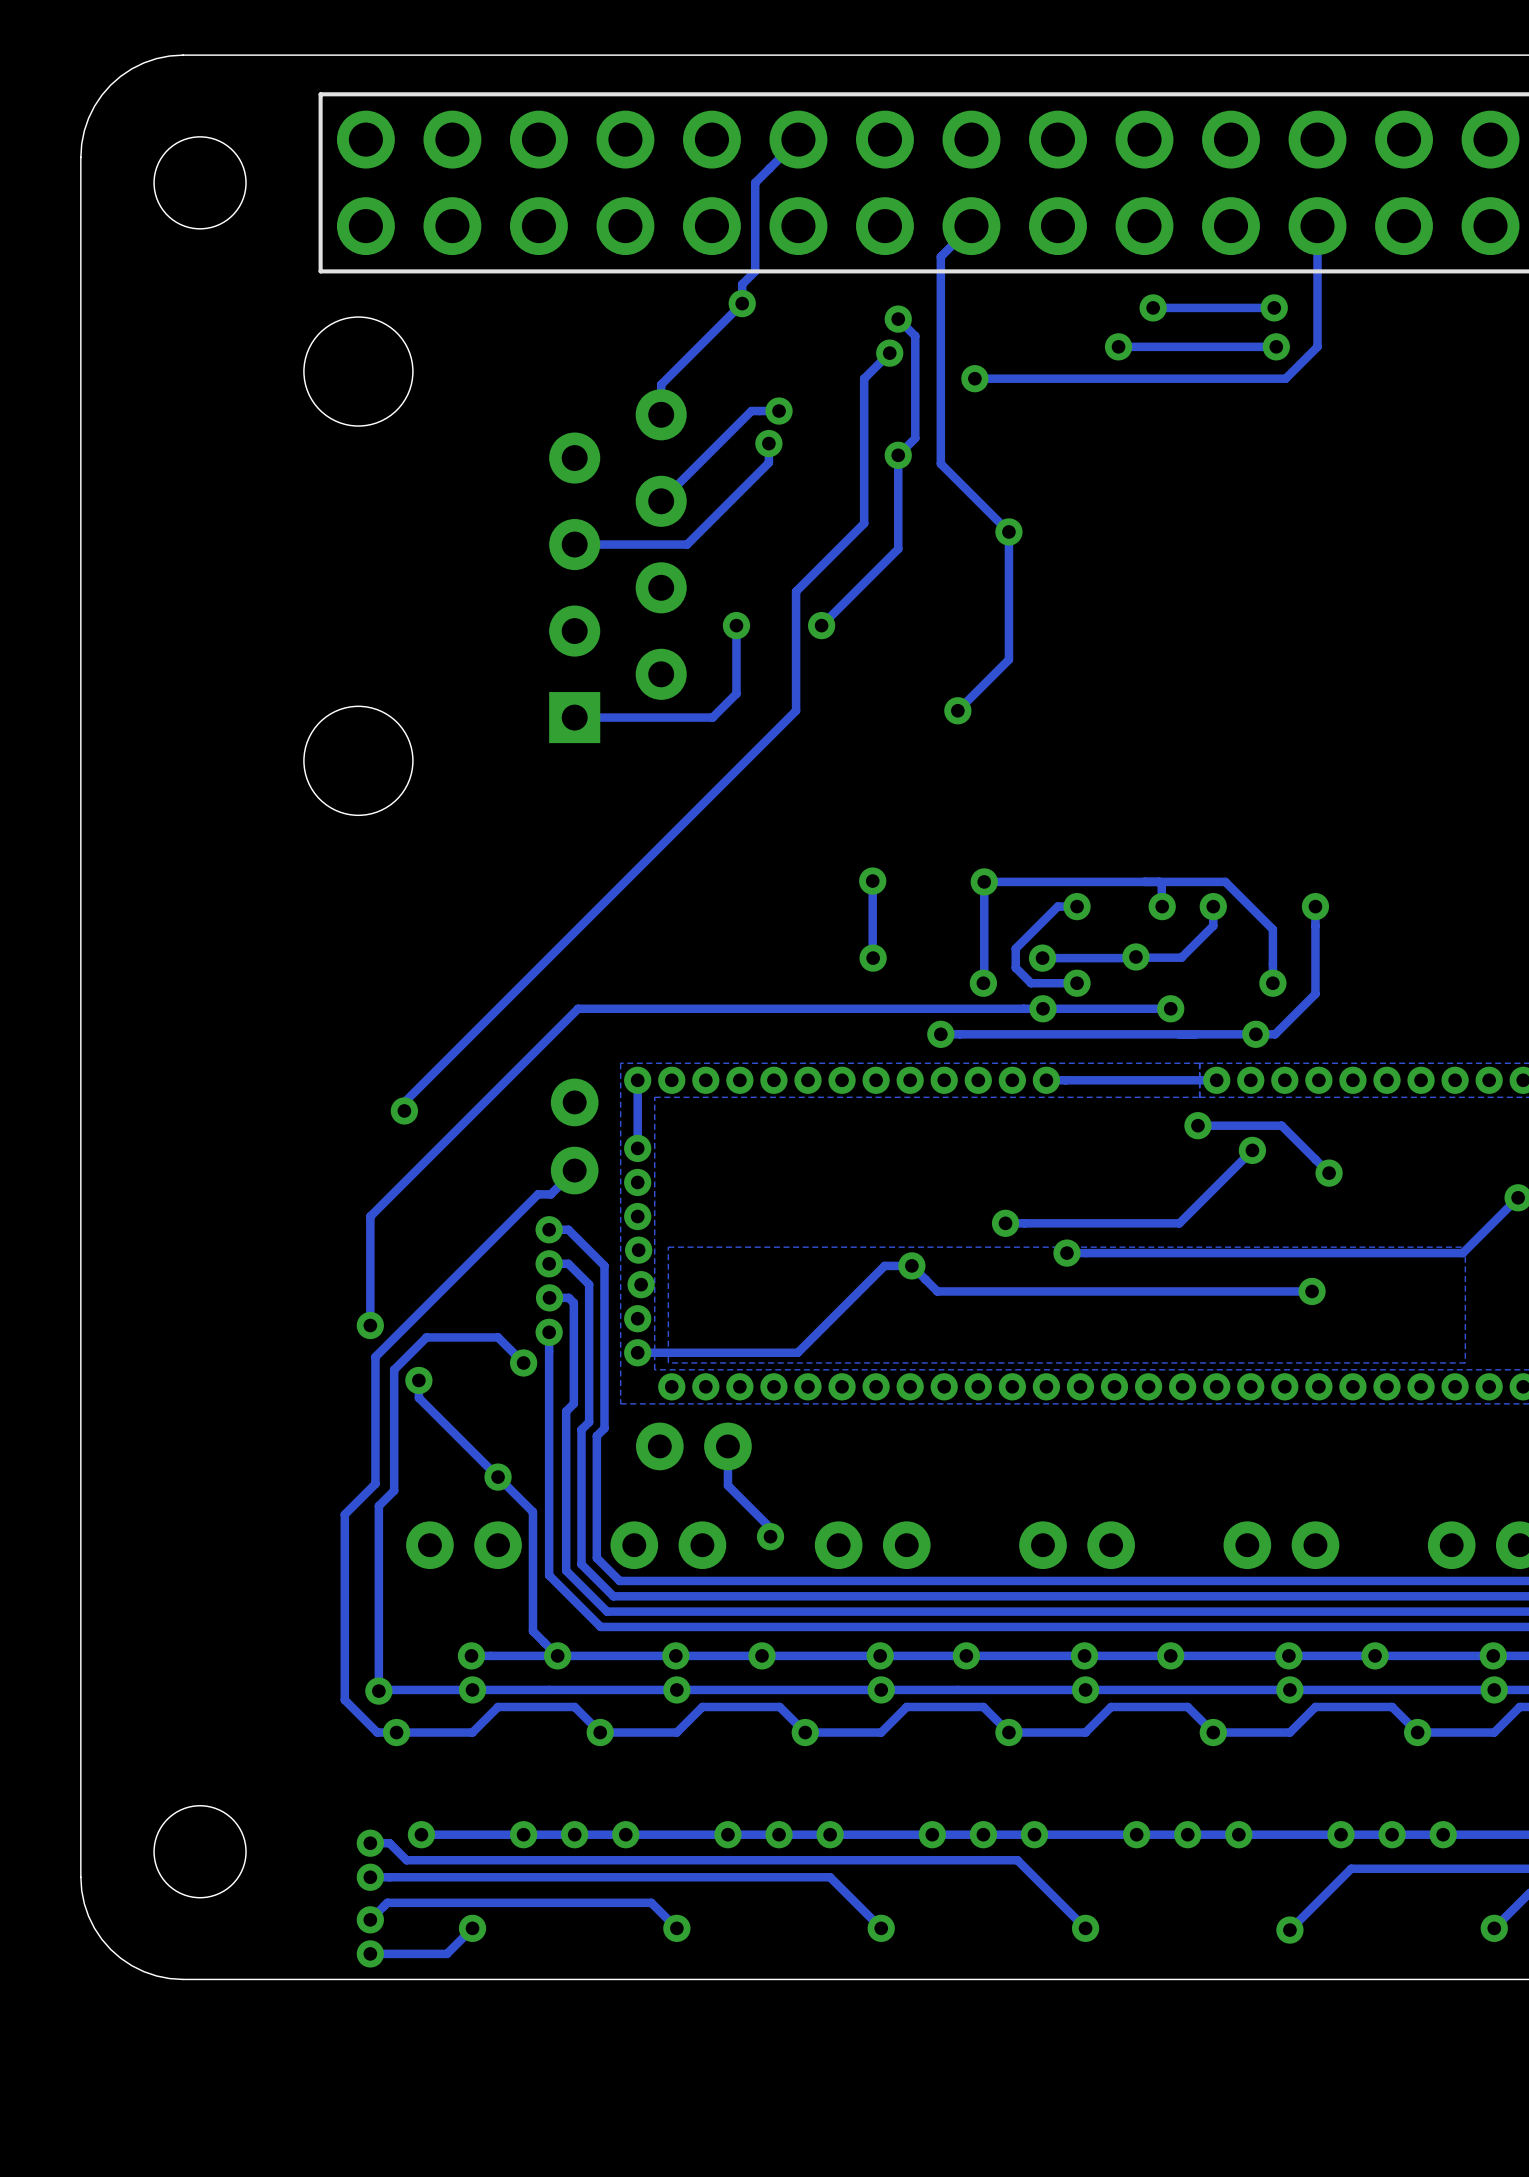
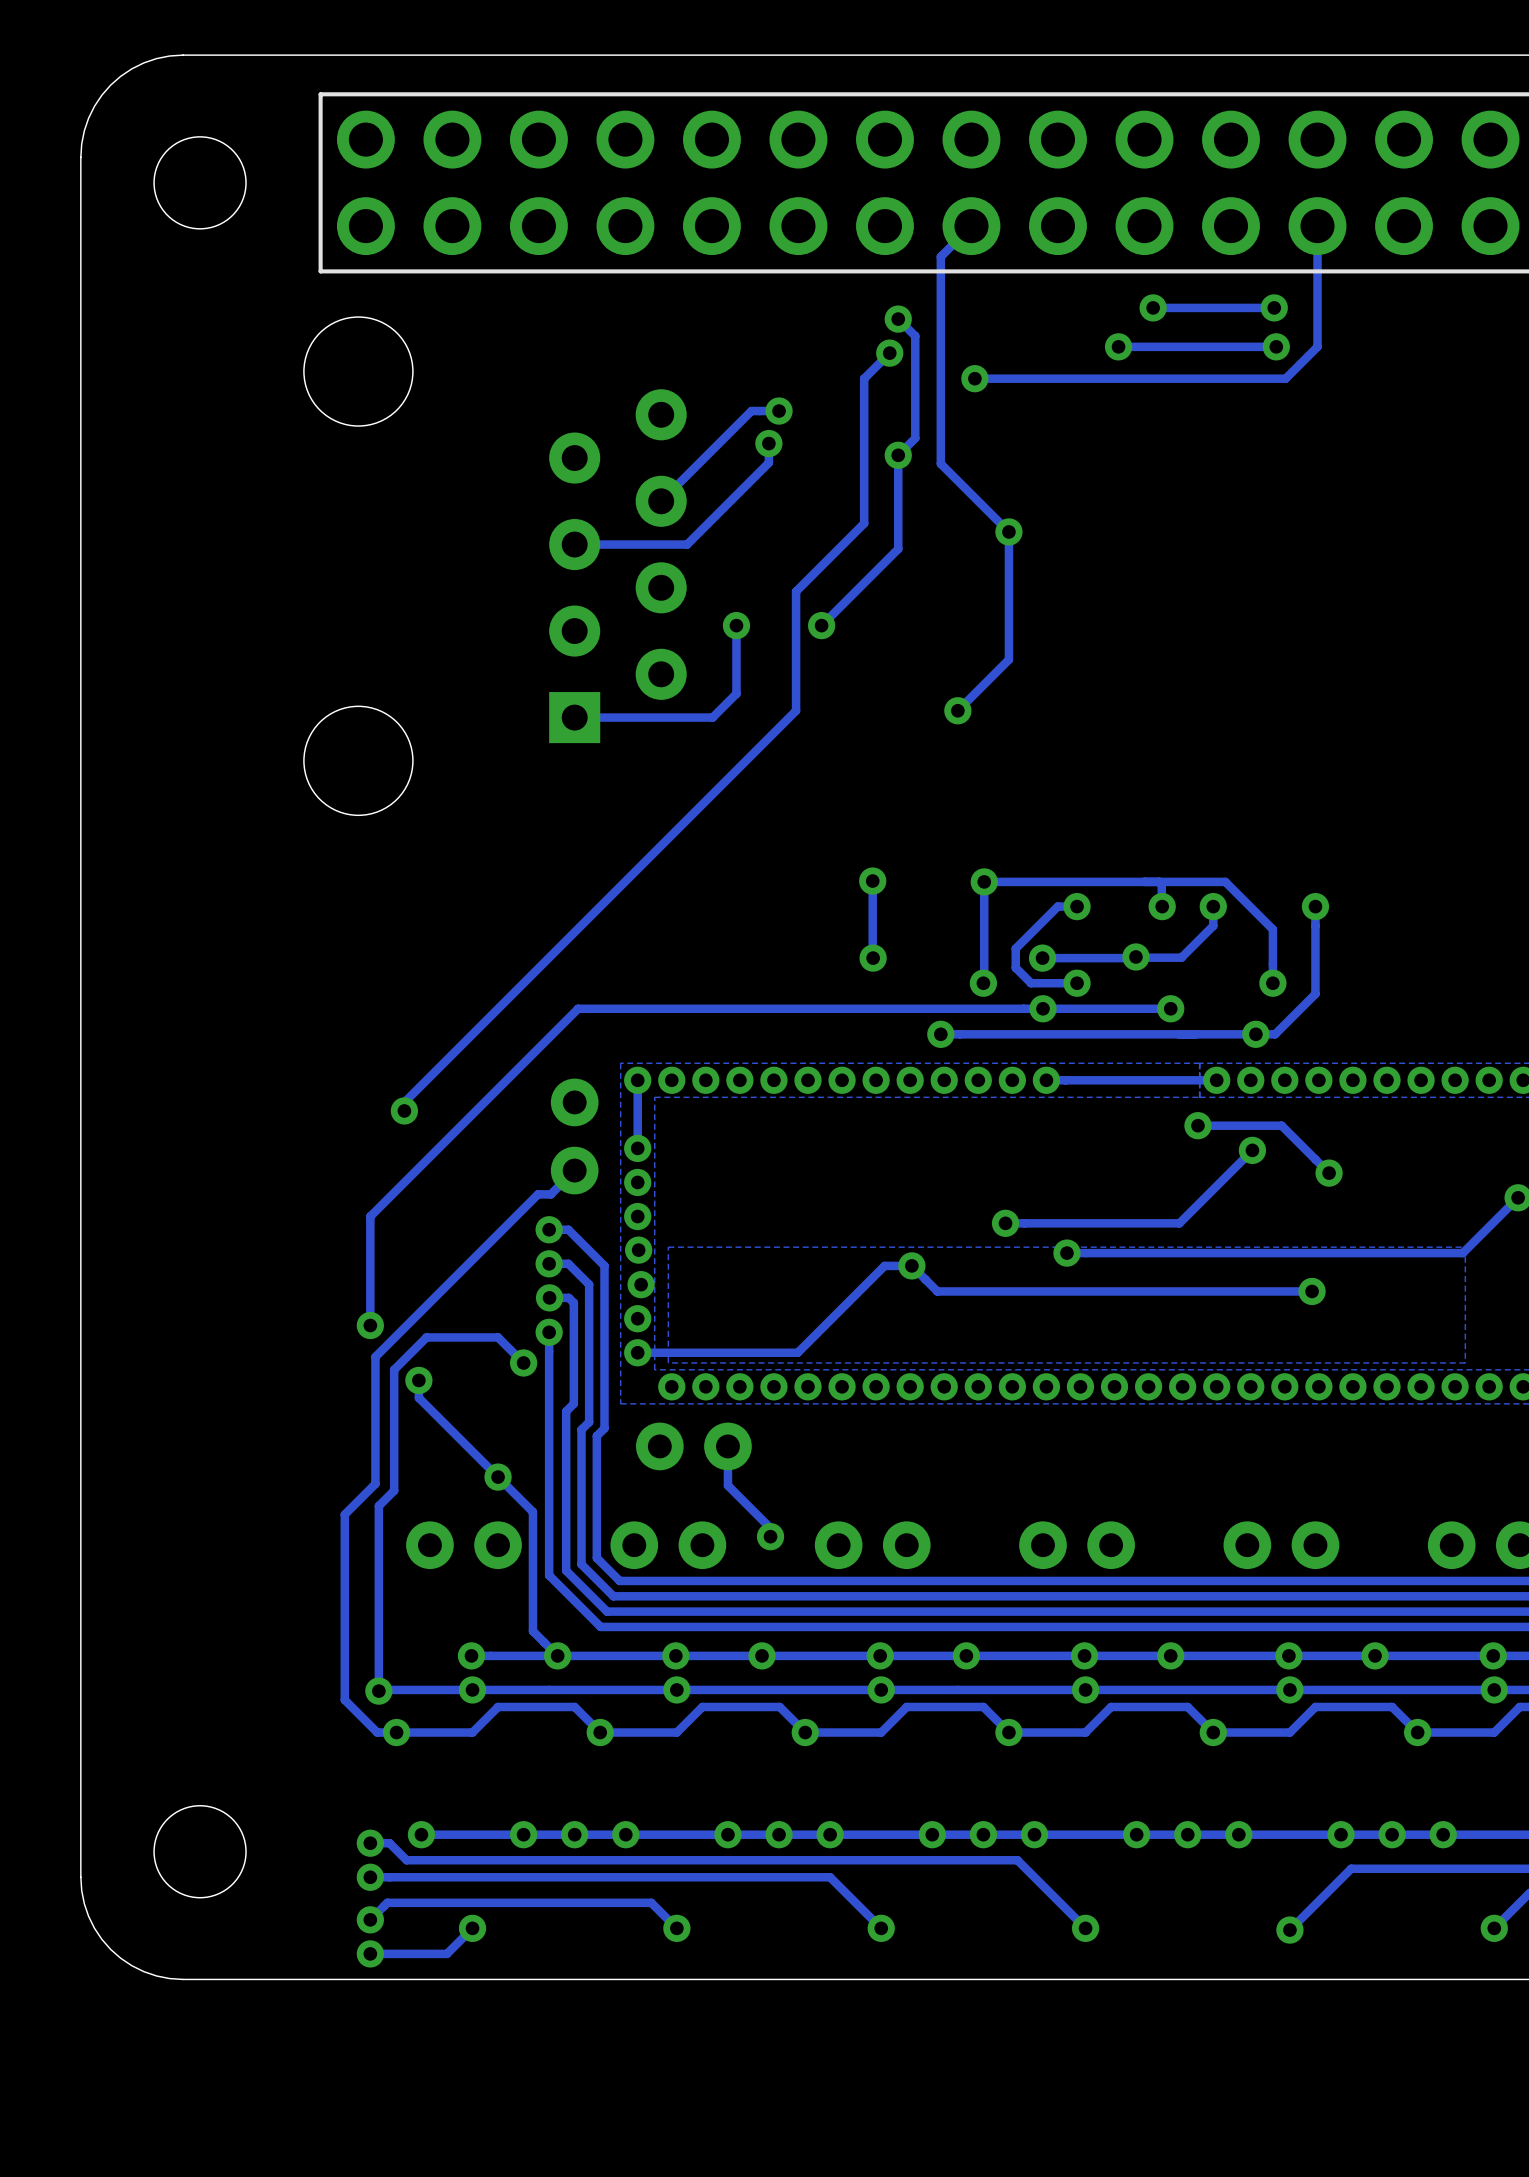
track: (798, 139) (755, 182) (755, 271) (742, 284) (742, 303) (661, 384) (661, 414) -> none
via: (742, 303) -> none

